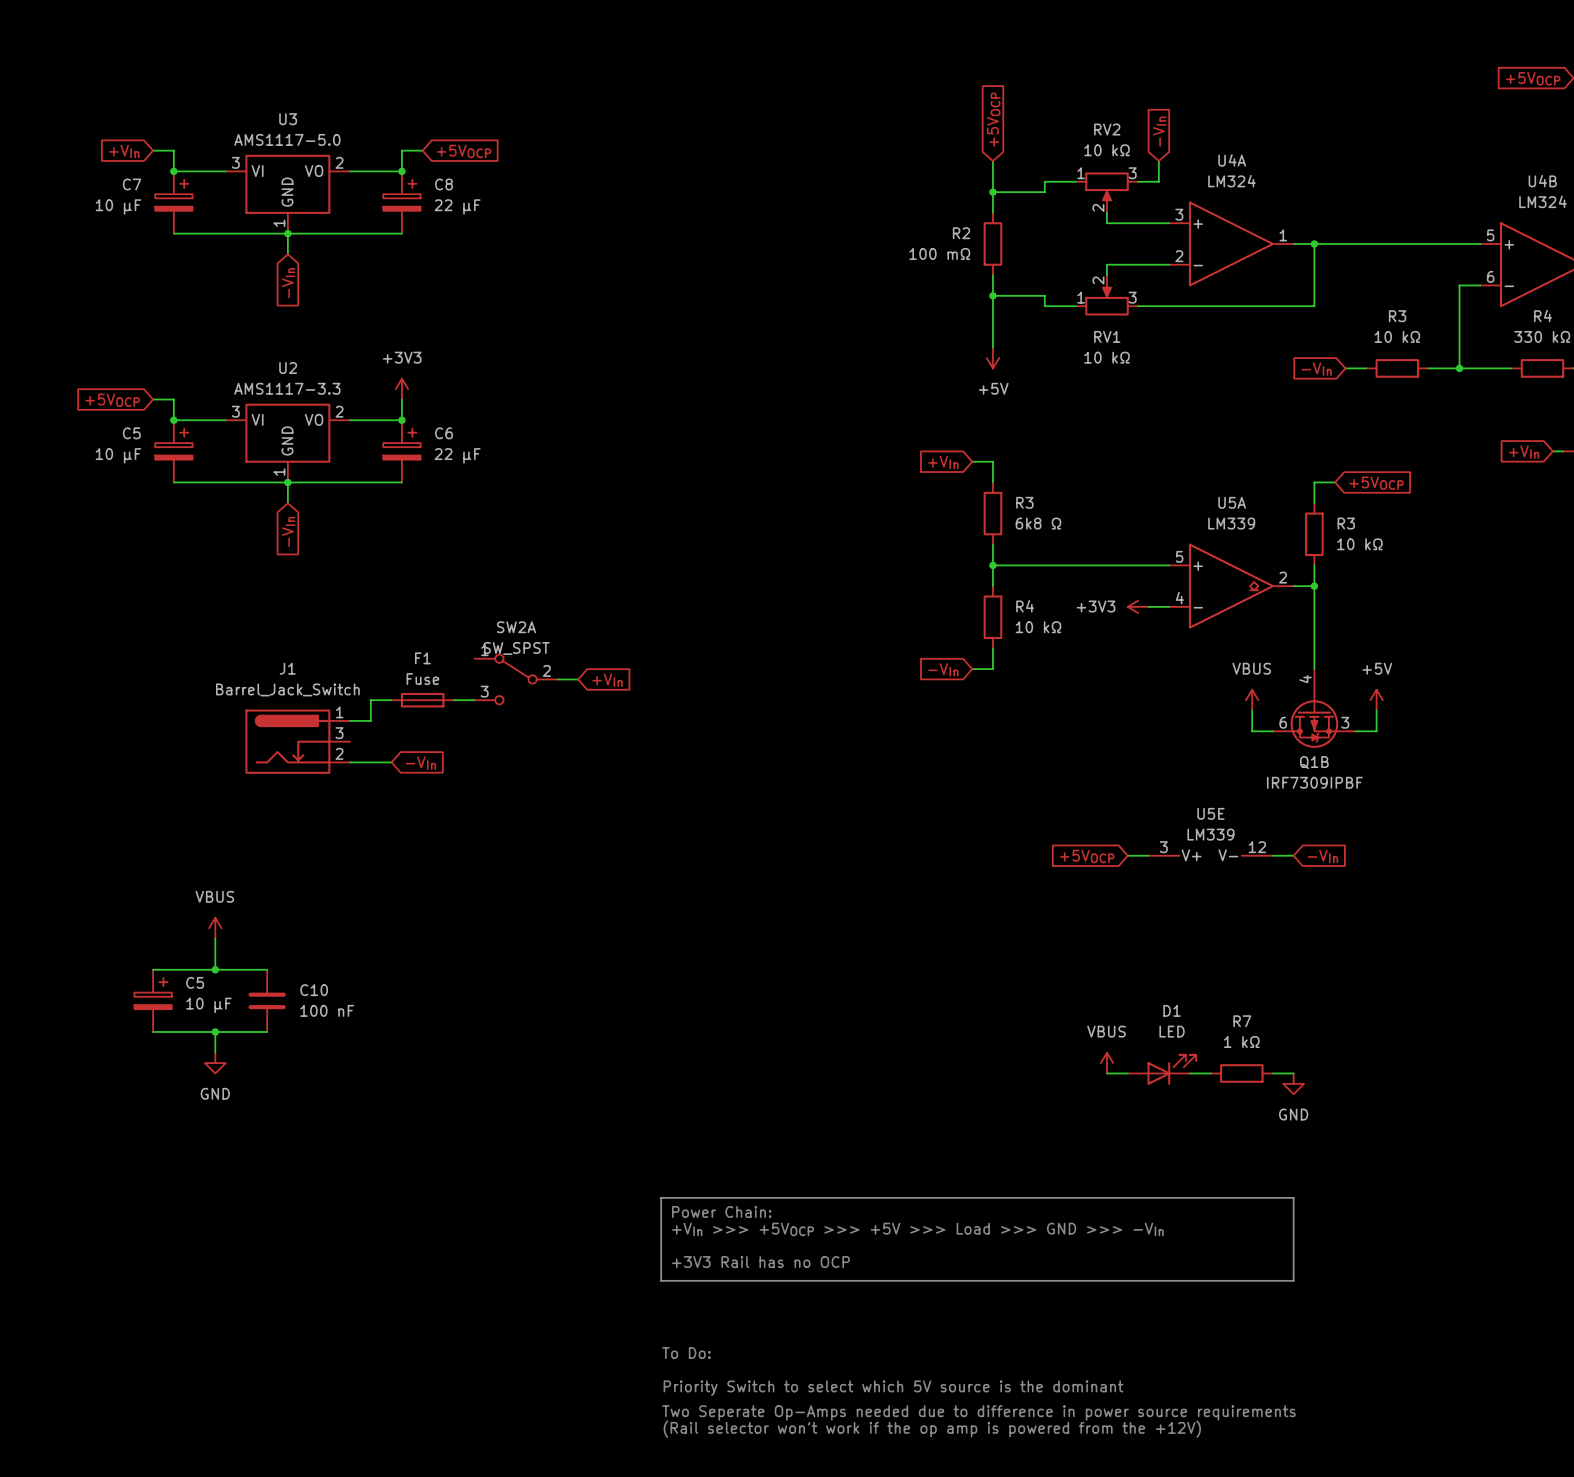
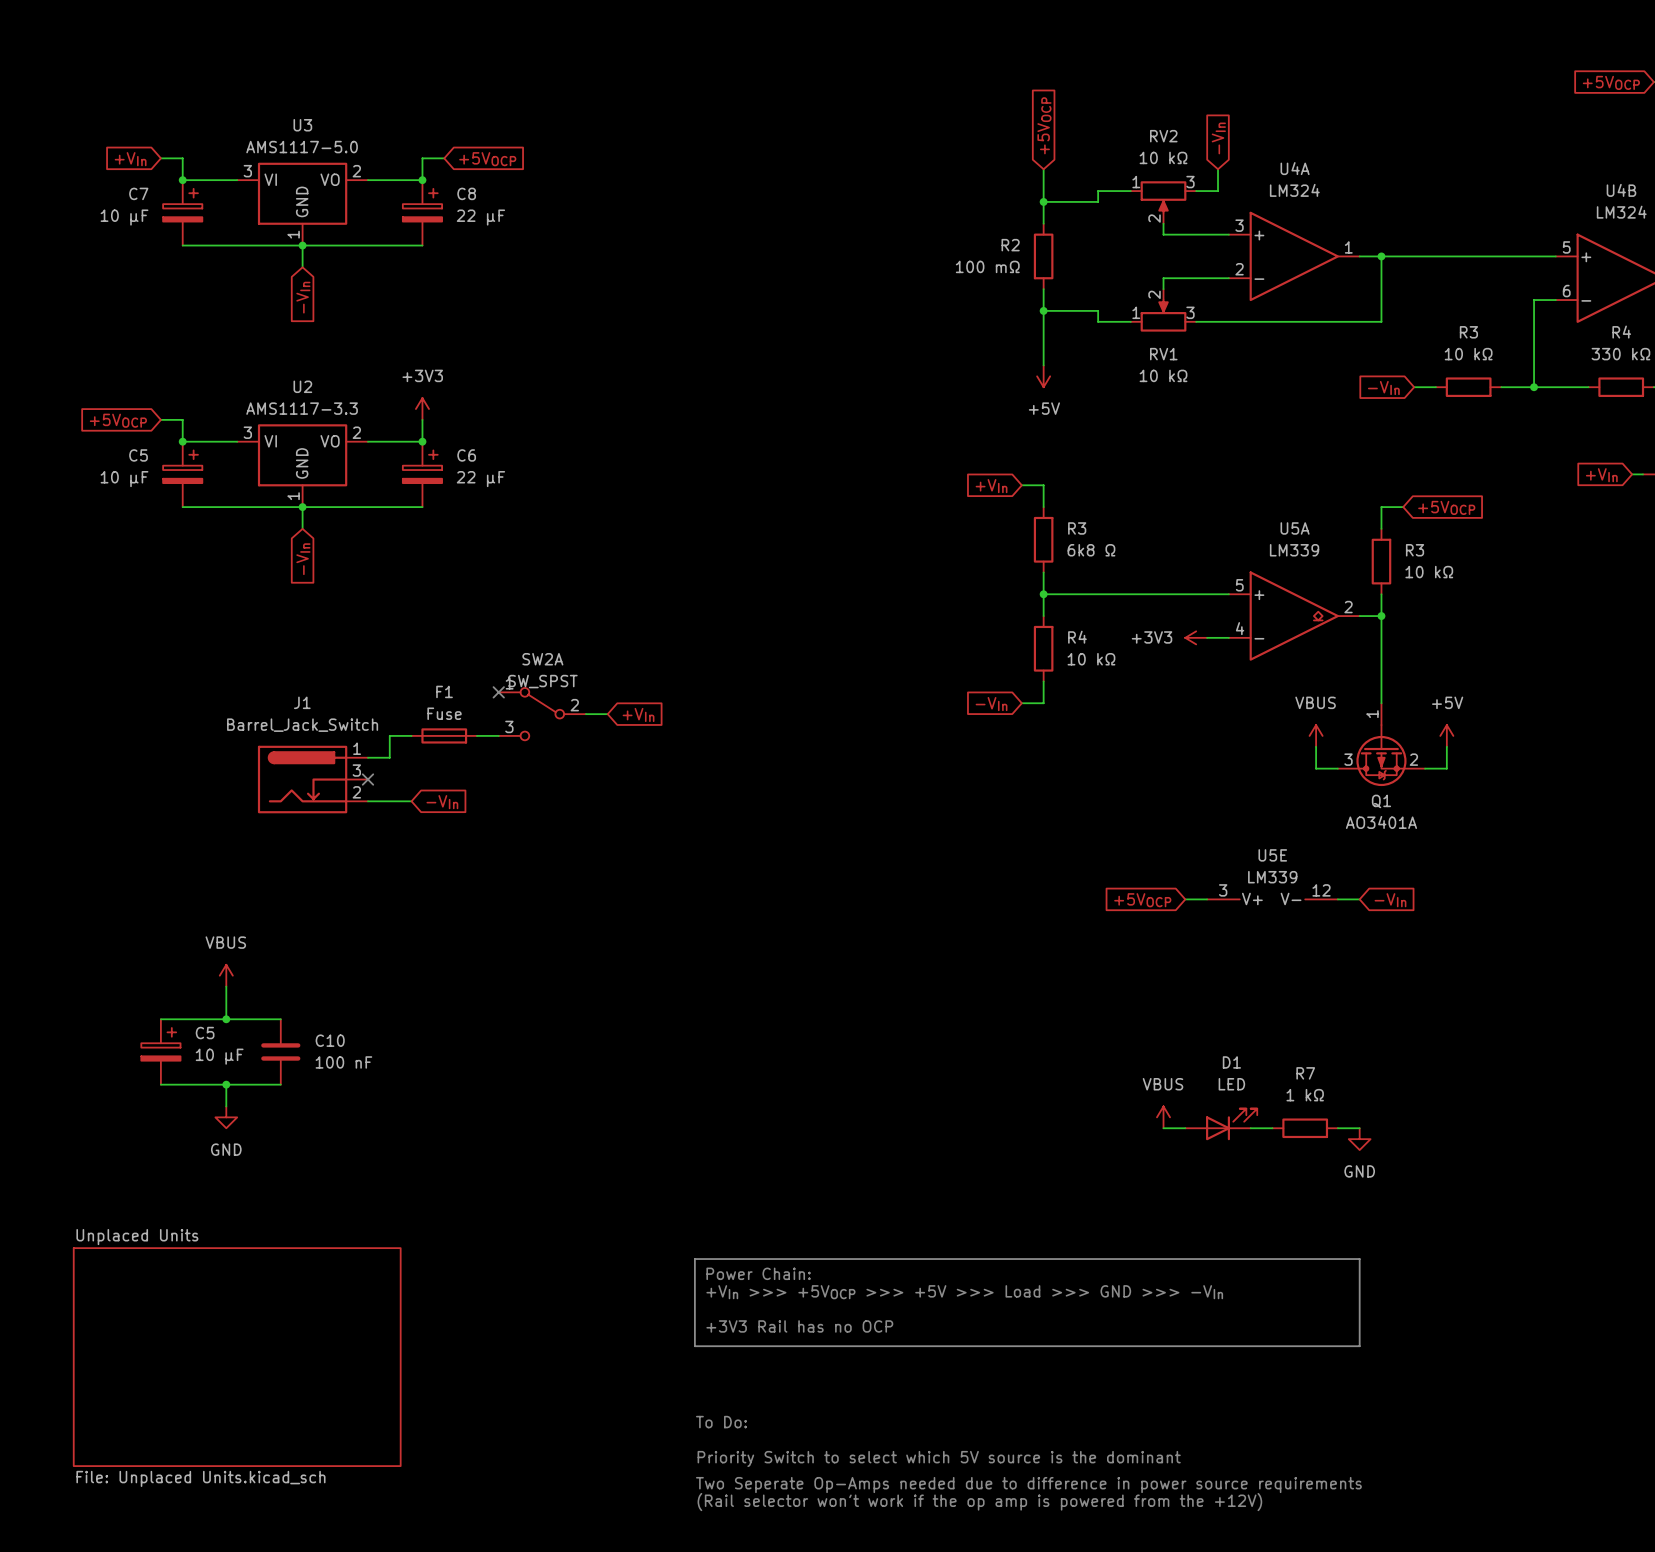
no-connect mark: none -> (498, 692)
Q1B pin number: 4 (1305, 679) -> 1 (1372, 714)
Q1B pin number: 6 (1283, 722) -> 3 (1348, 759)
Q1B pin number: 3 (1345, 722) -> 2 (1413, 759)
no-connect mark: none -> (367, 779)
Q1B name: Q1B (1314, 762) -> Q1 (1381, 801)
Q1B value: IRF7309IPBF (1314, 782) -> AO3401A (1381, 822)
sheet Unplaced Units: none -> File: Unplaced Units.kicad_sch (237, 1357)

